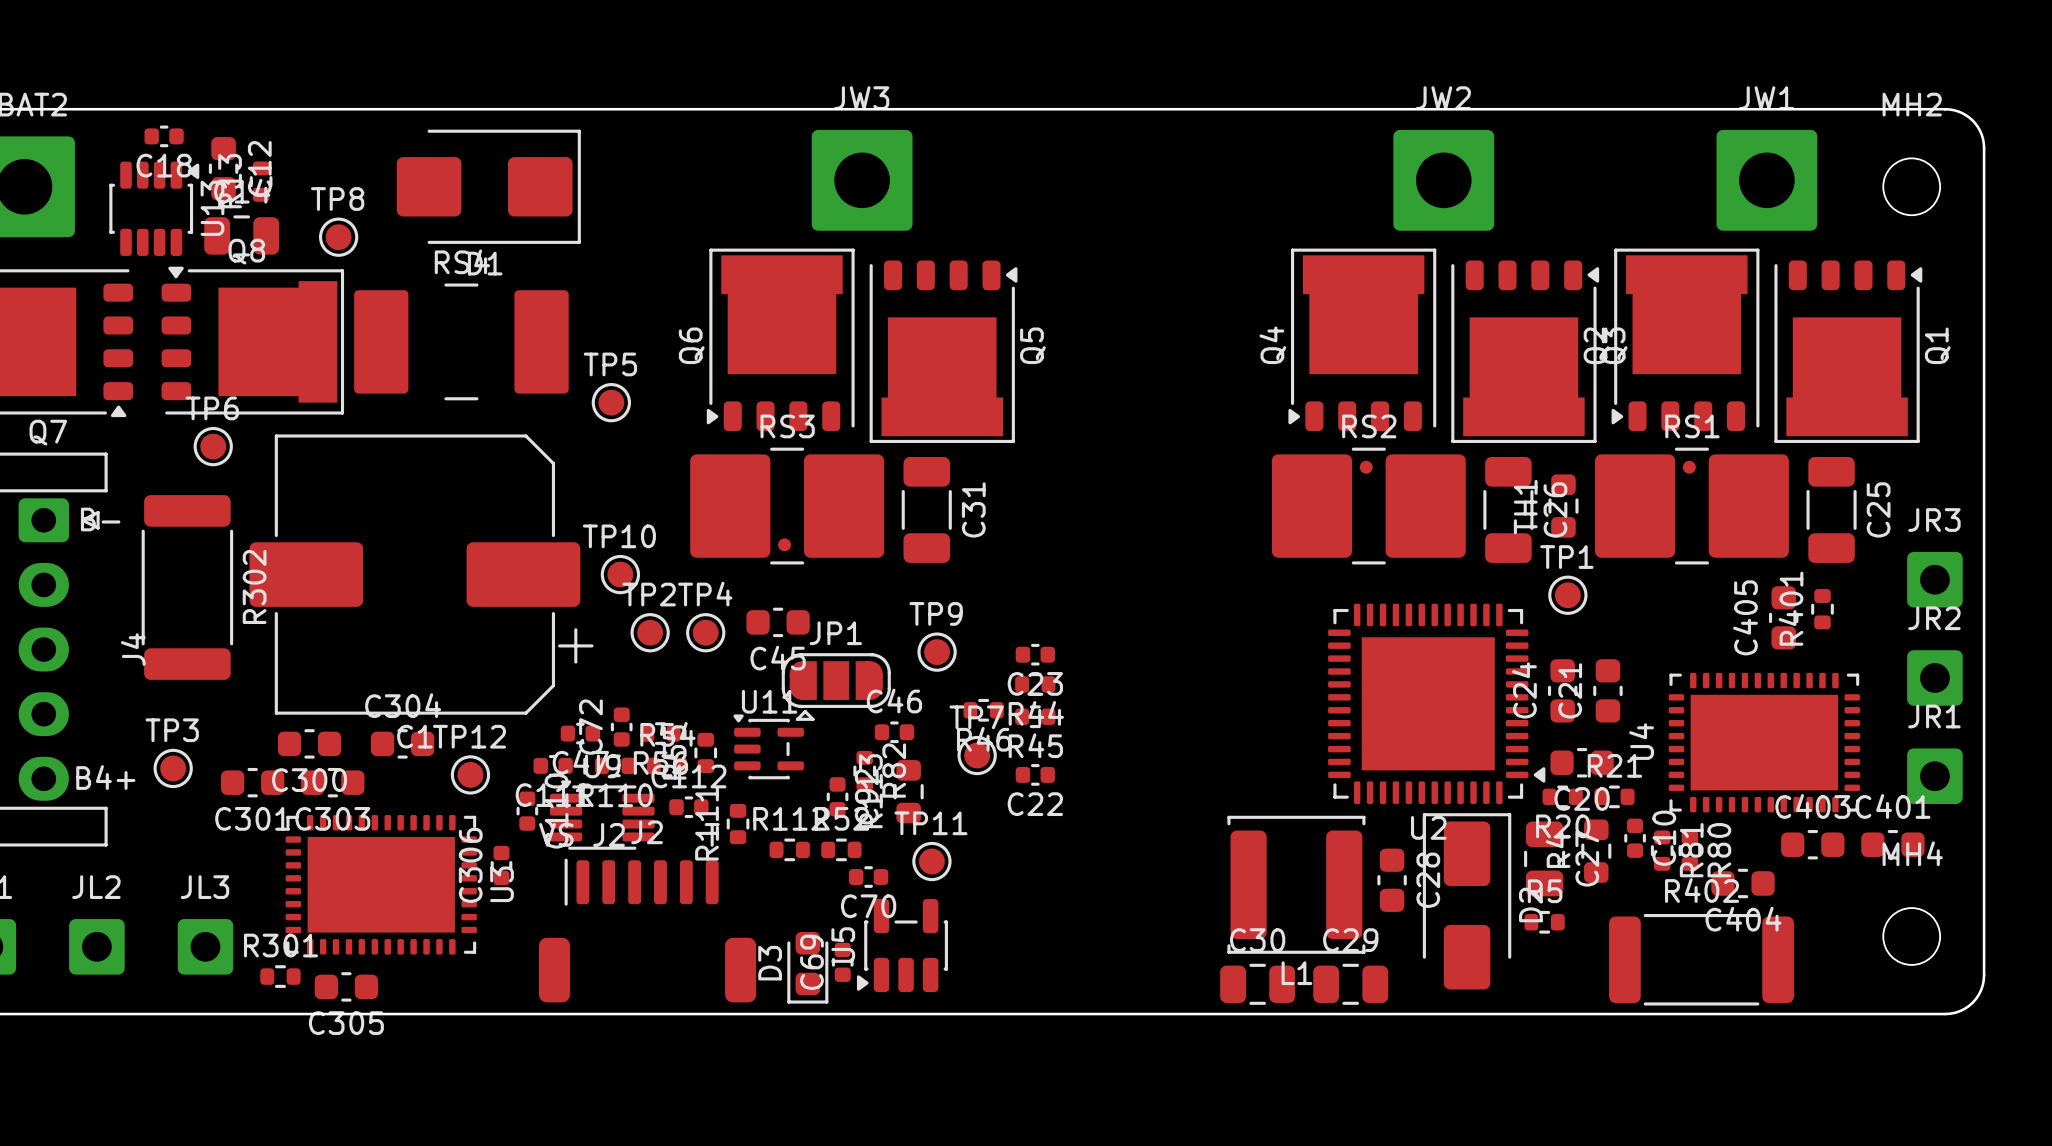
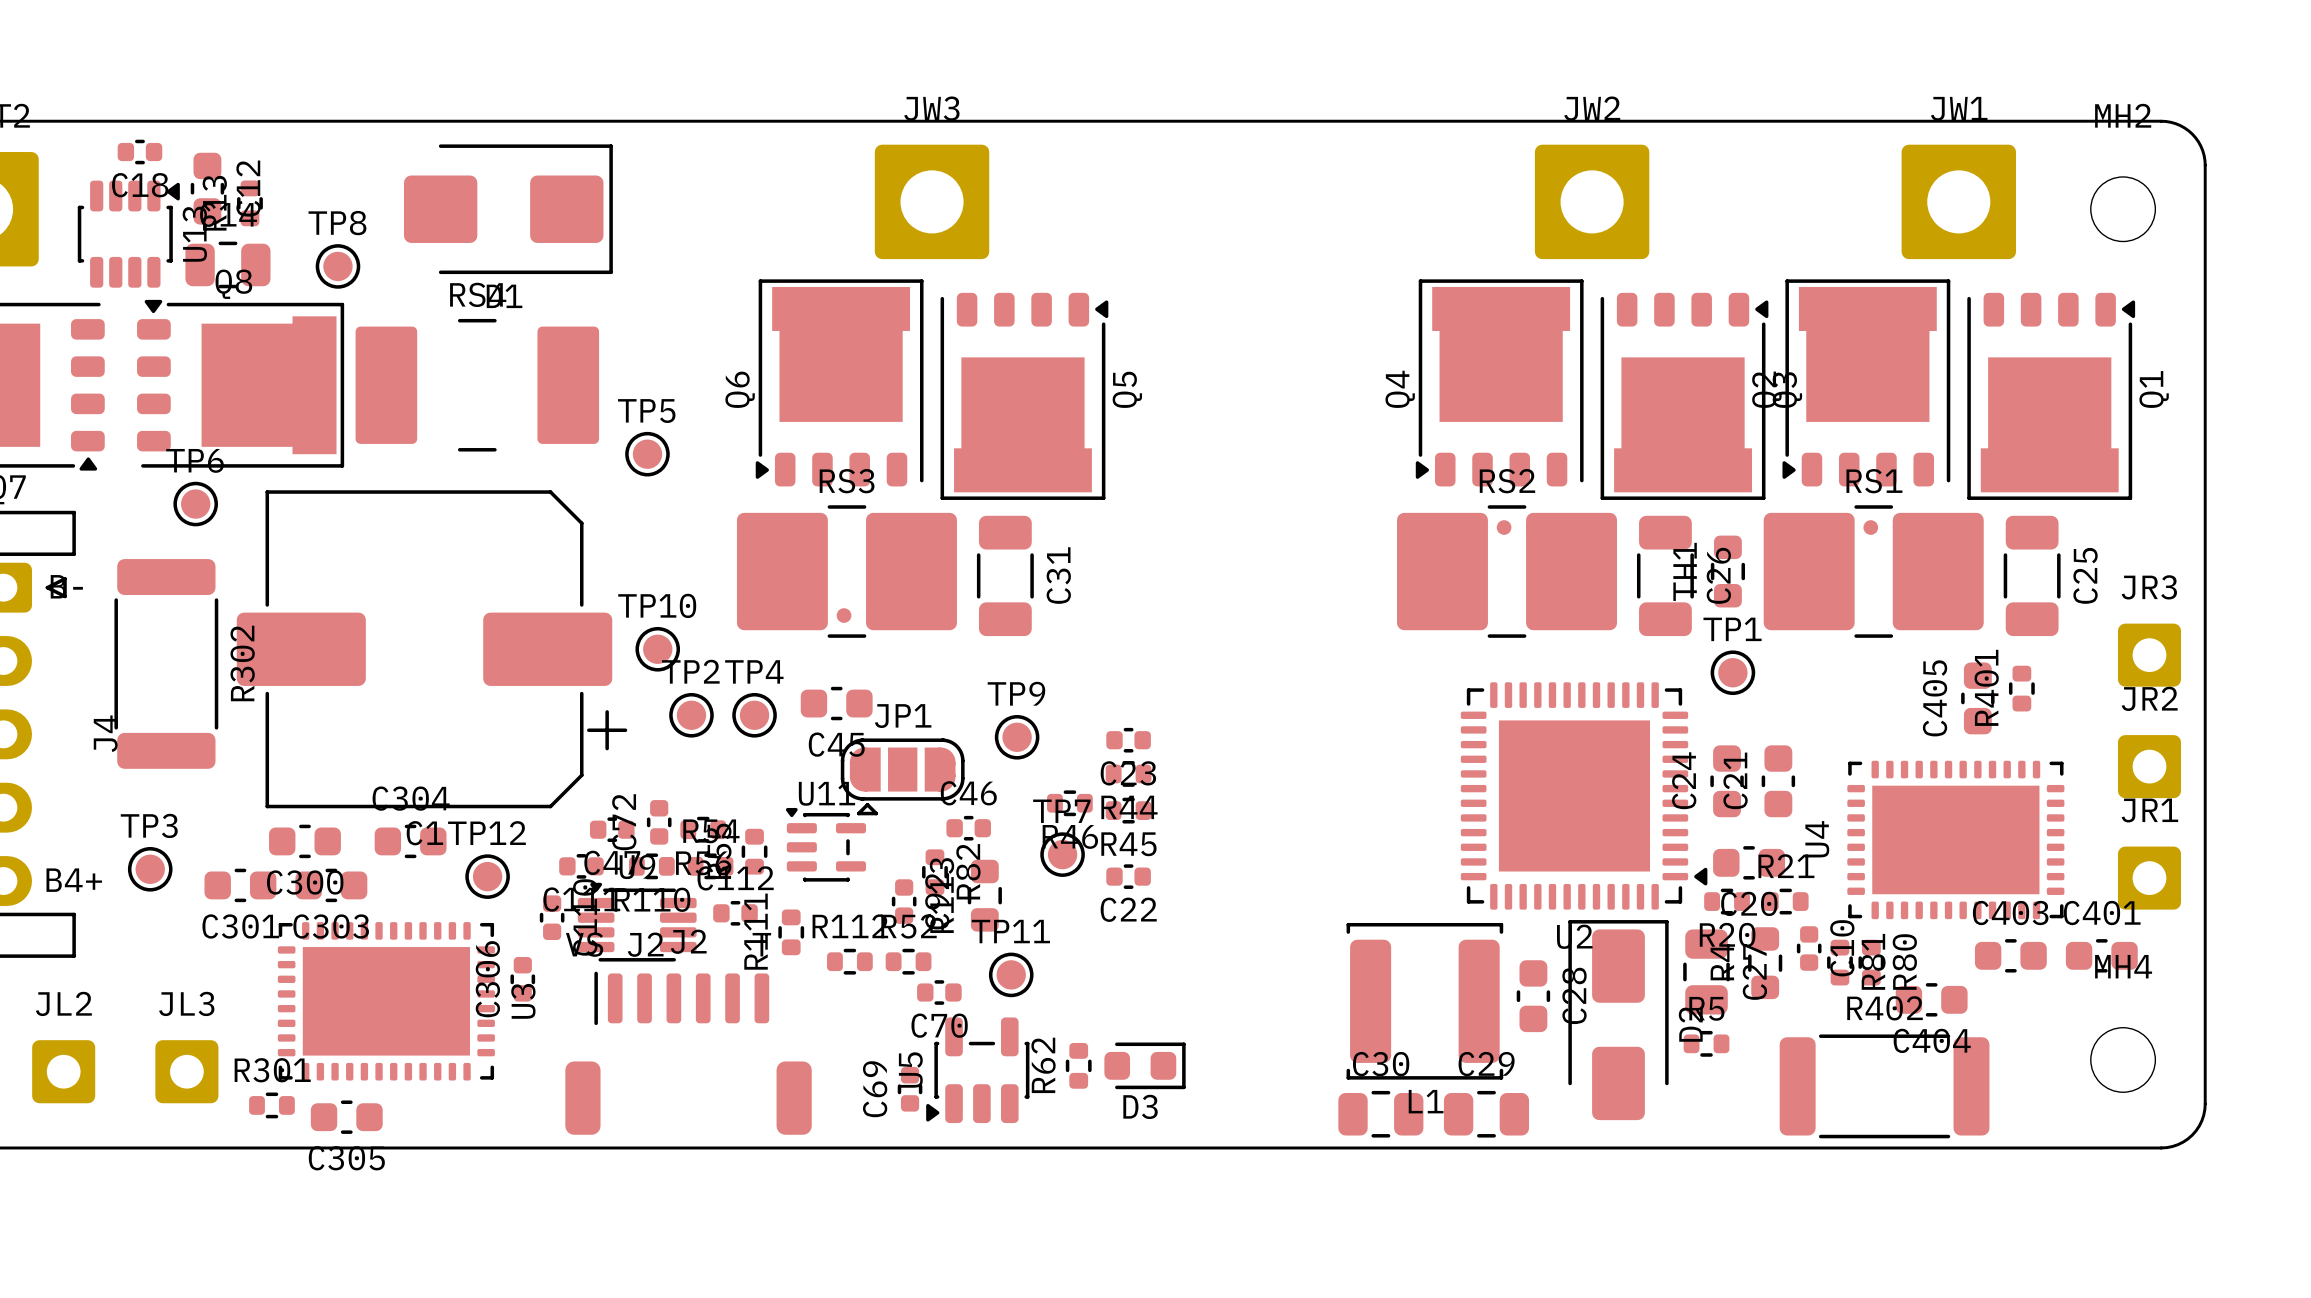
R62: none -> (1078, 1065)
D3 rotation: 0° (807, 967) -> 90° counterclockwise (1145, 1065)
D3 position: (807, 967) -> (1145, 1065)

